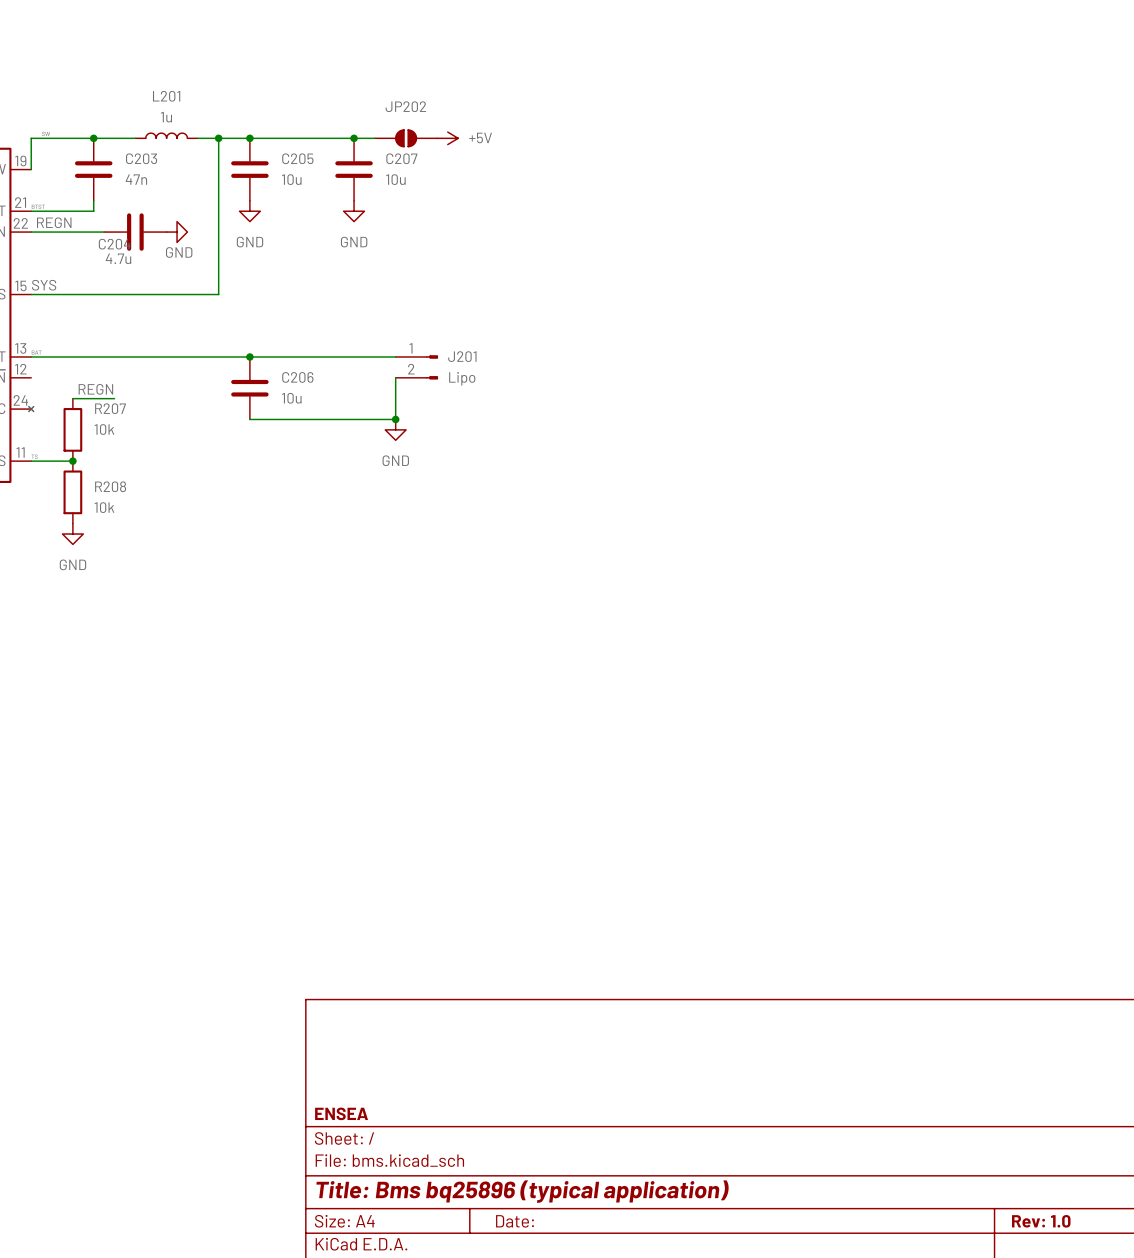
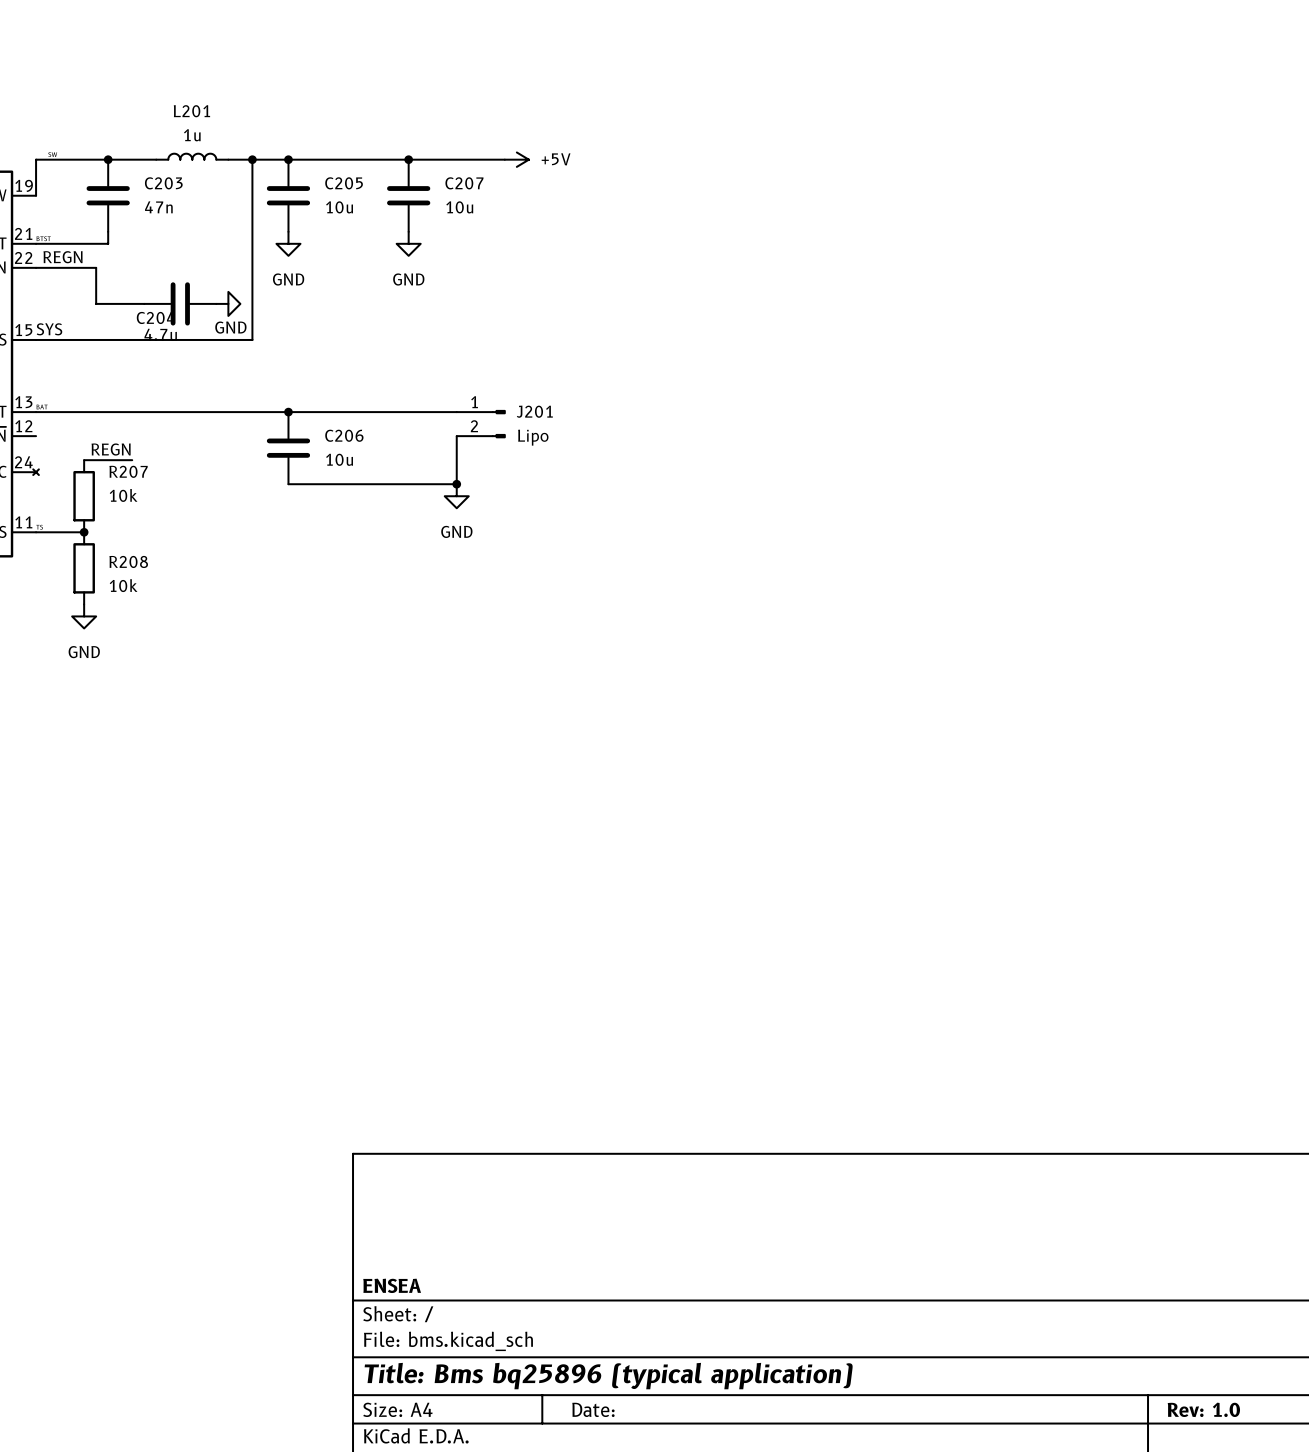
JP202: (406, 138) -> none
wire: (83, 232) (104, 232) -> (96, 267) (96, 303) (144, 303)
C204 position: (135, 232) -> (180, 303)
power symbol position: GND (177, 232) -> GND (228, 303)

